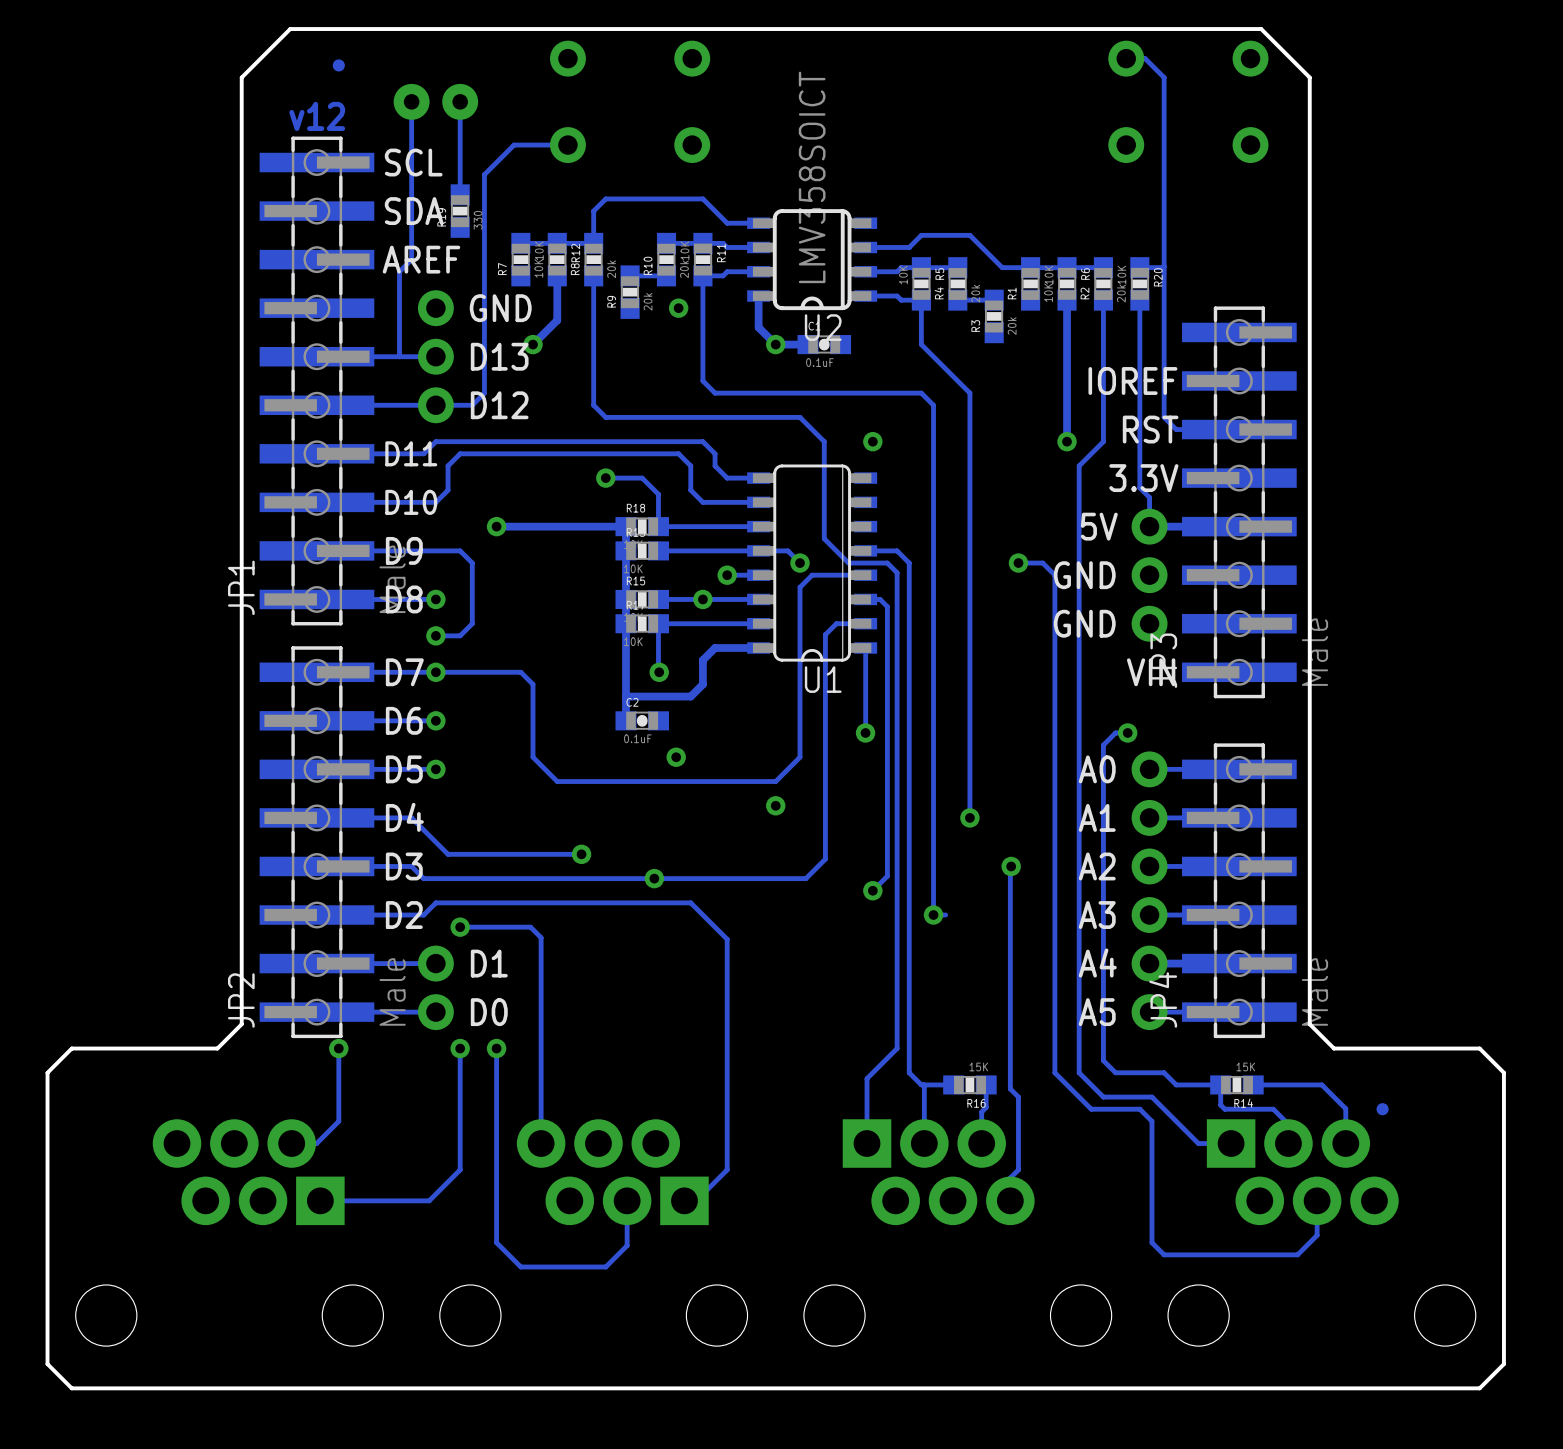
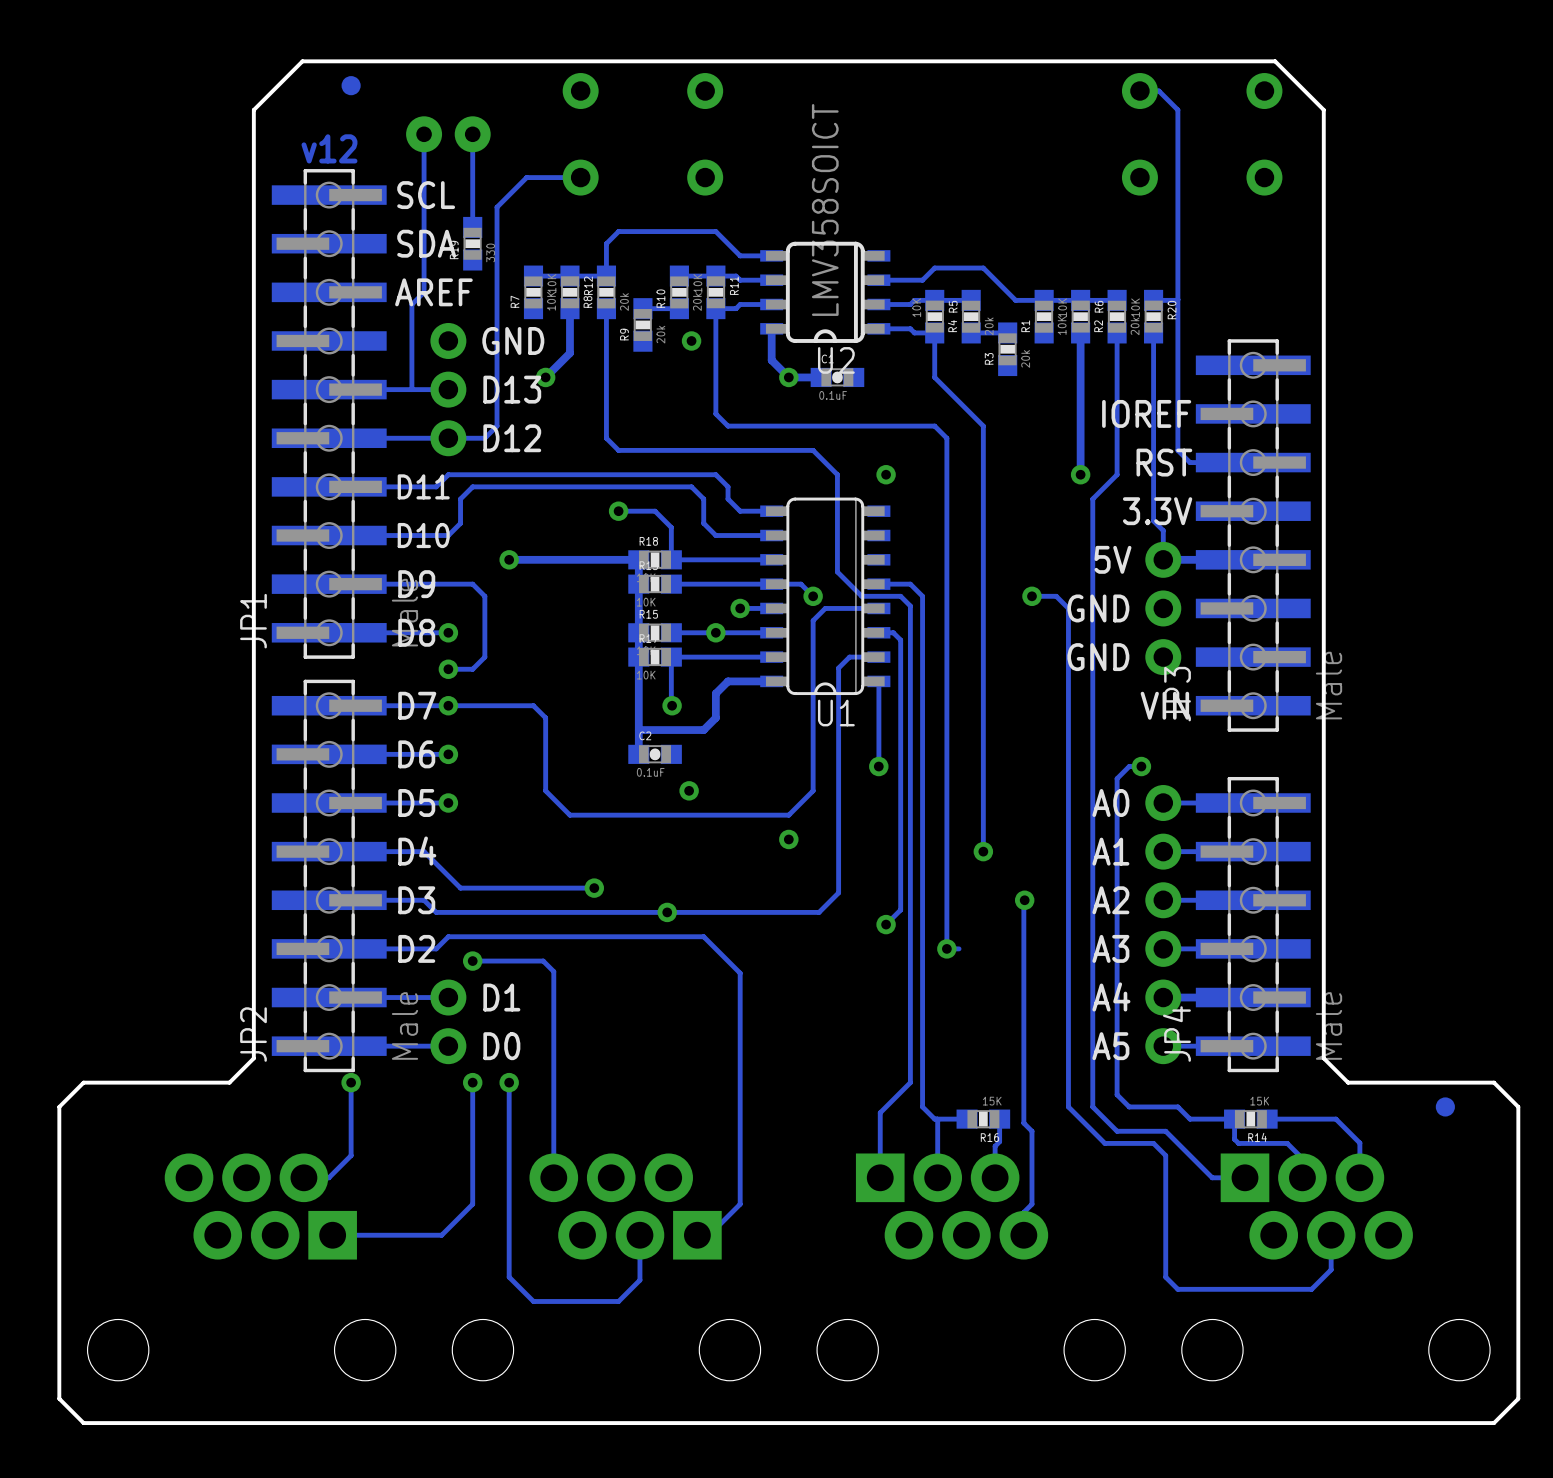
part footprint: [332, 59, 345, 72] -> [341, 76, 361, 96]
part: none -> (1445, 1106)
part: (1382, 1109) -> none

